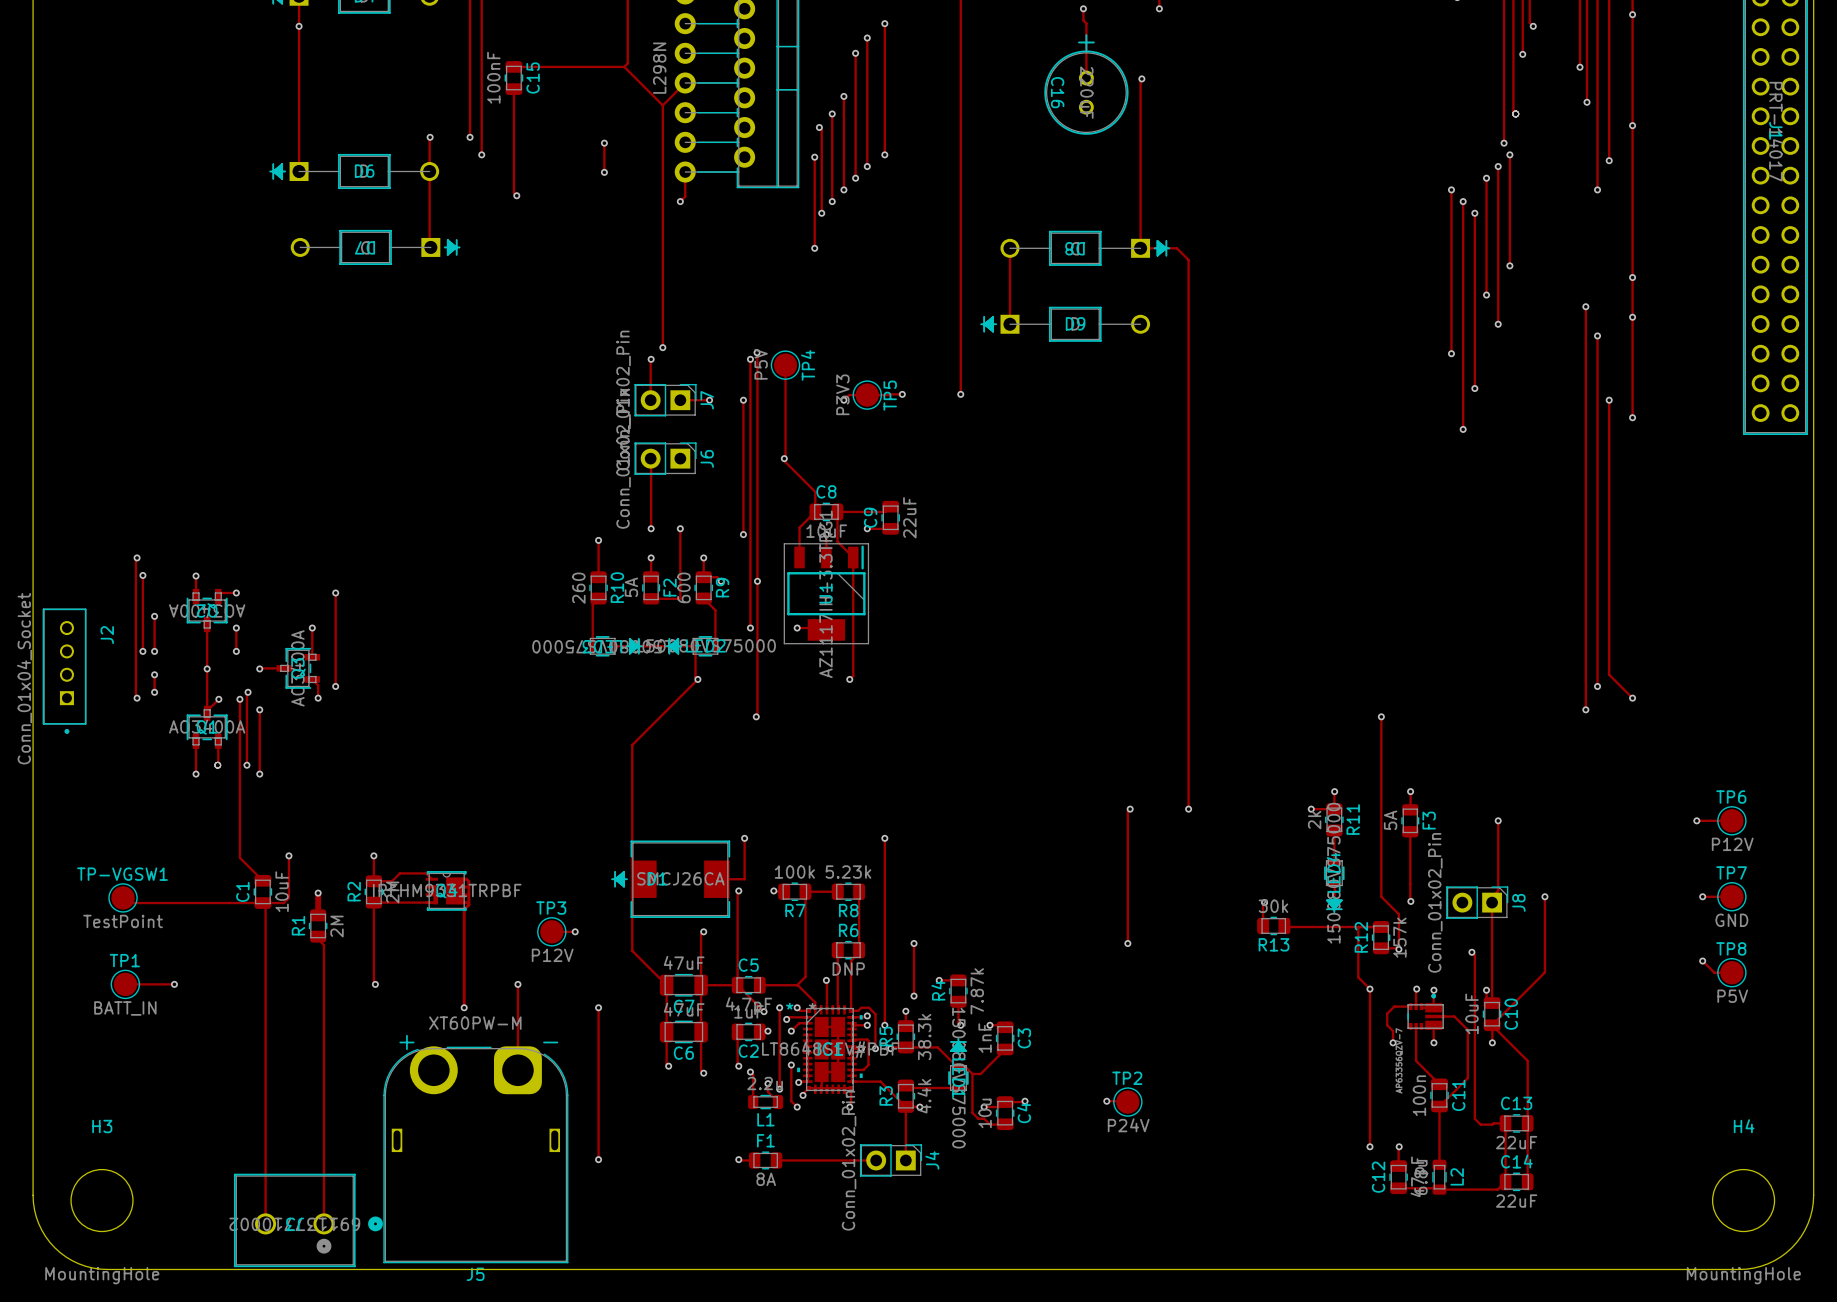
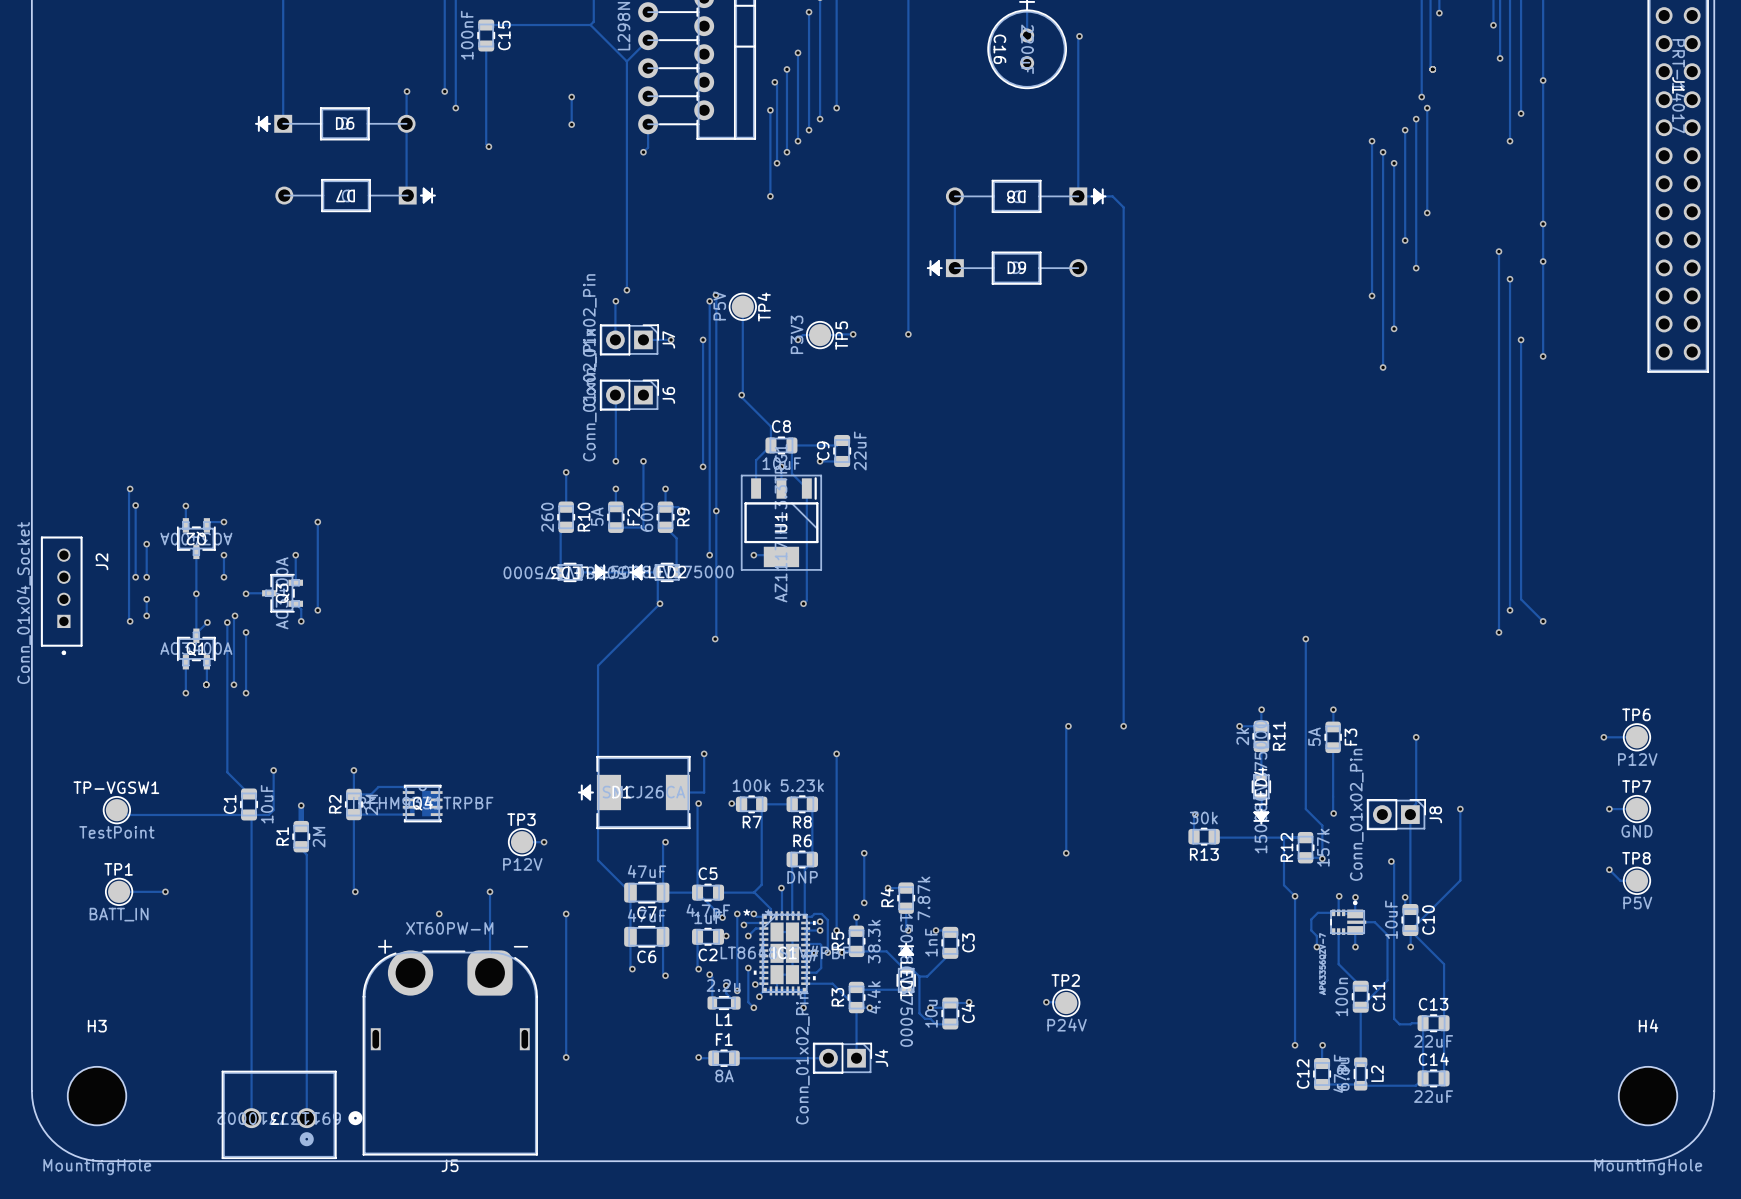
track: (466, 879) (468, 881) (468, 904) (464, 909) (464, 1007) -> none

